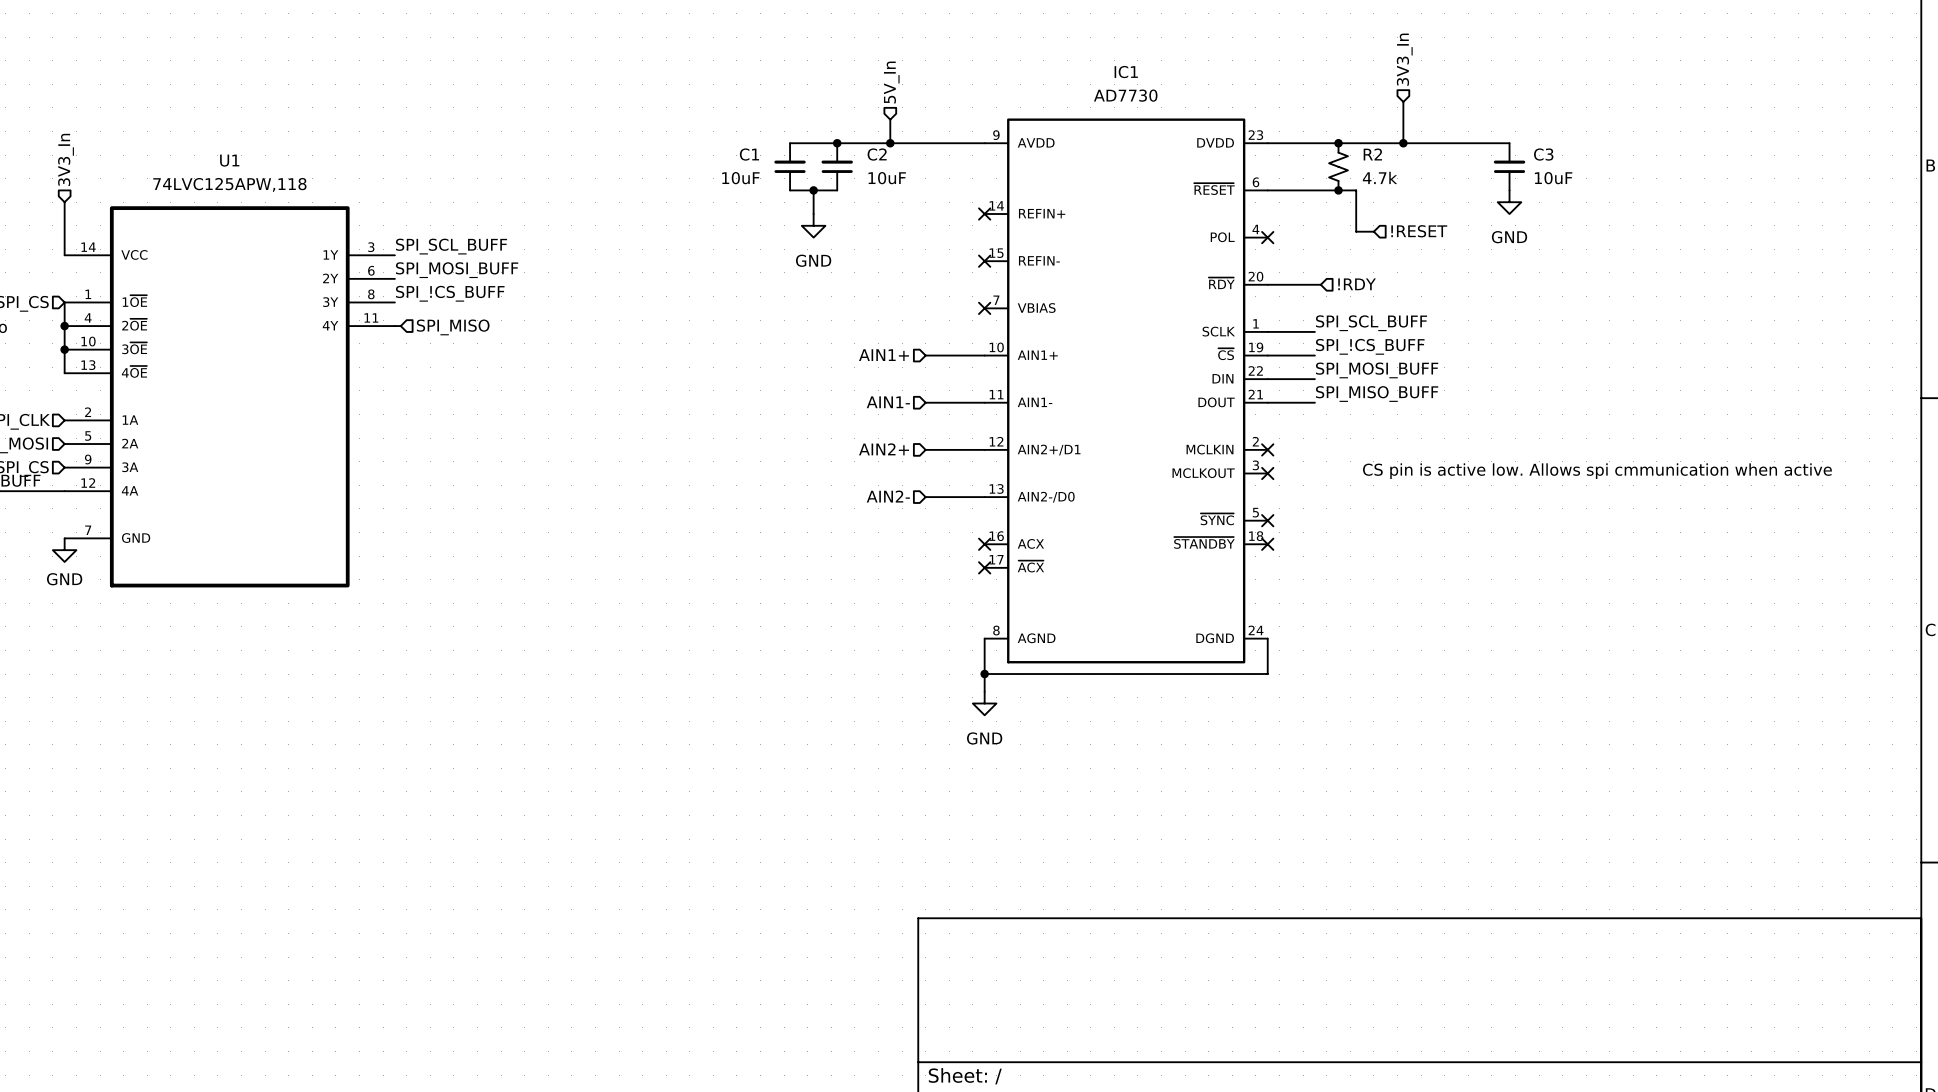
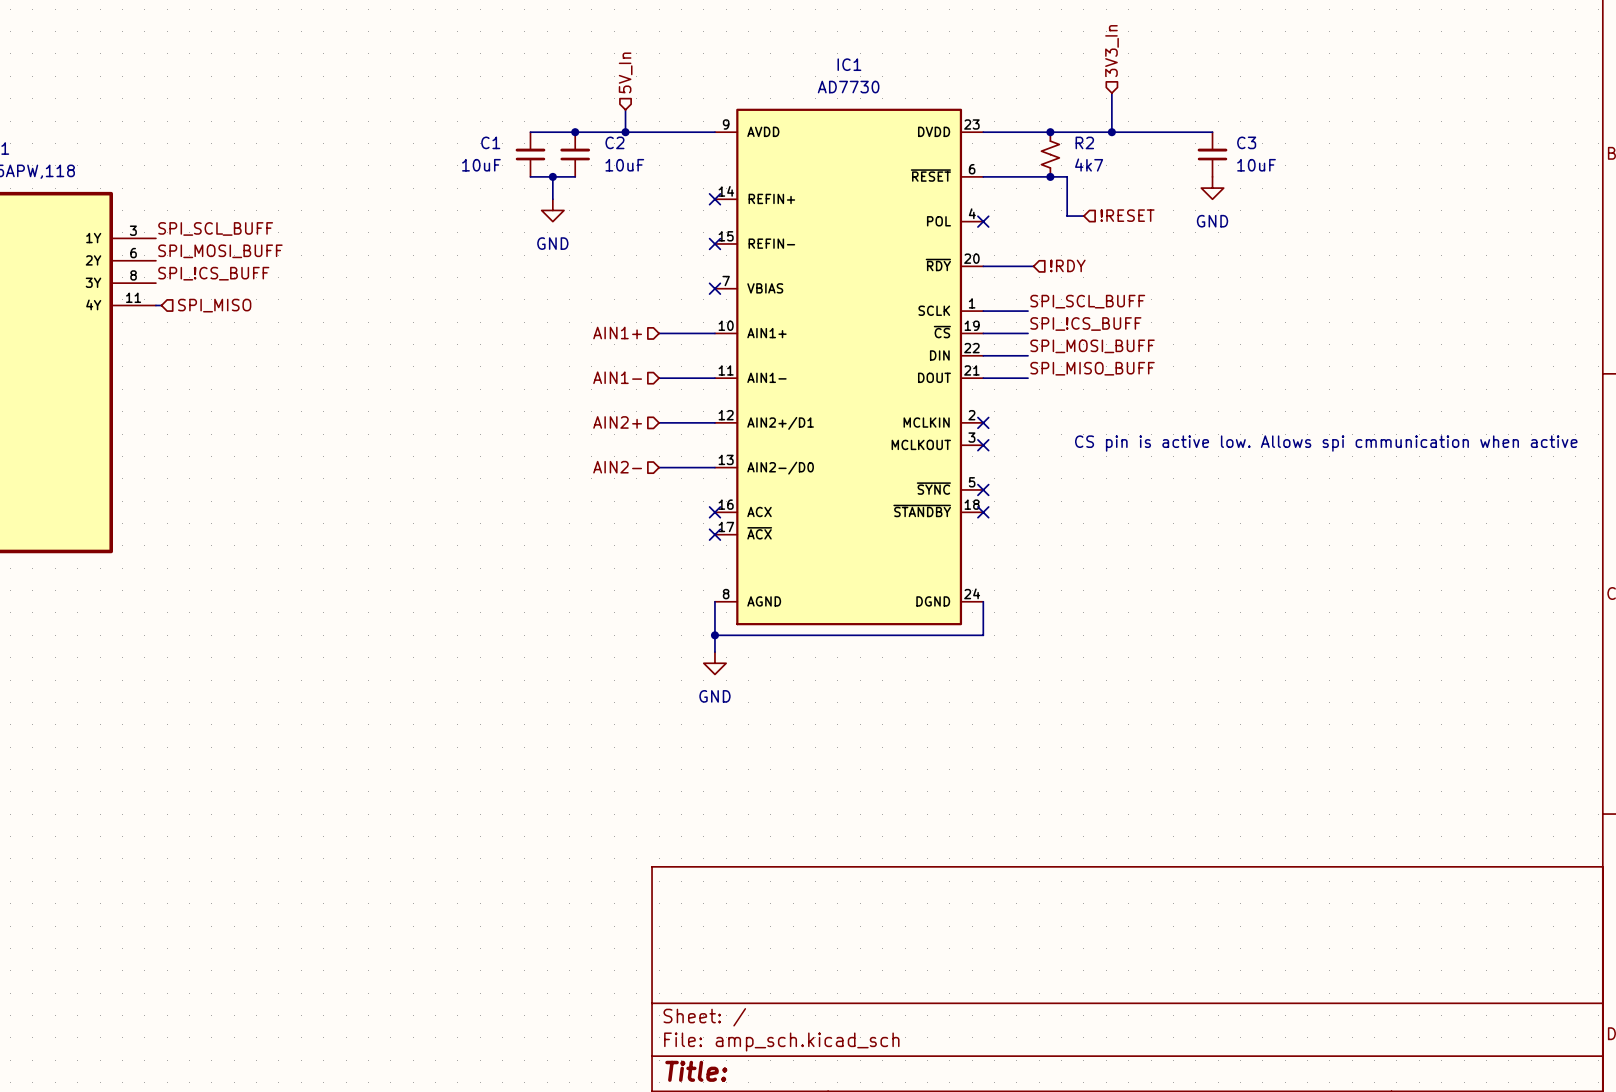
R2 value: 4.7k (1380, 177) -> 4k7 (1089, 165)

